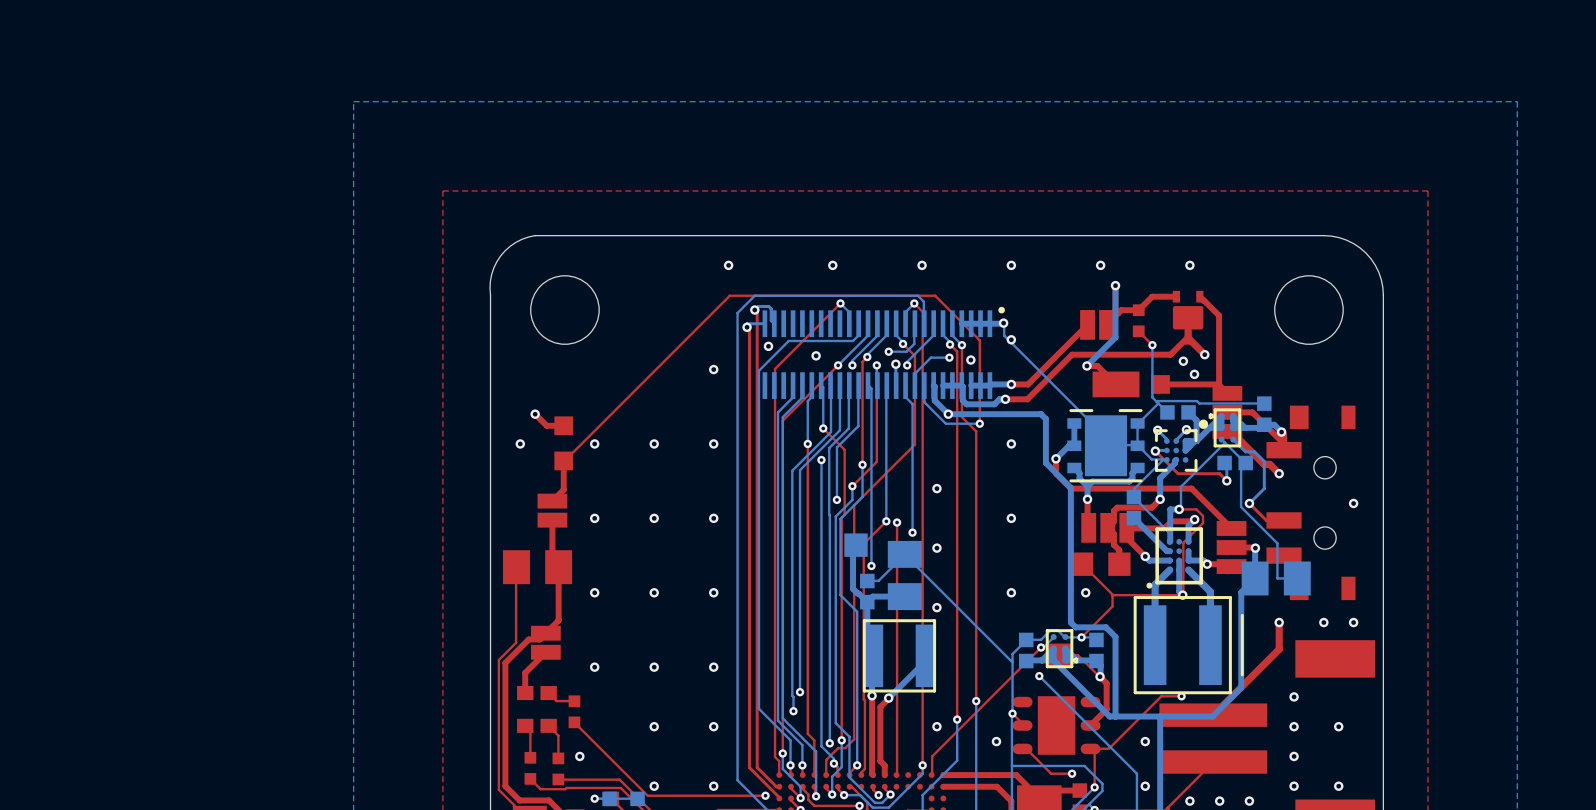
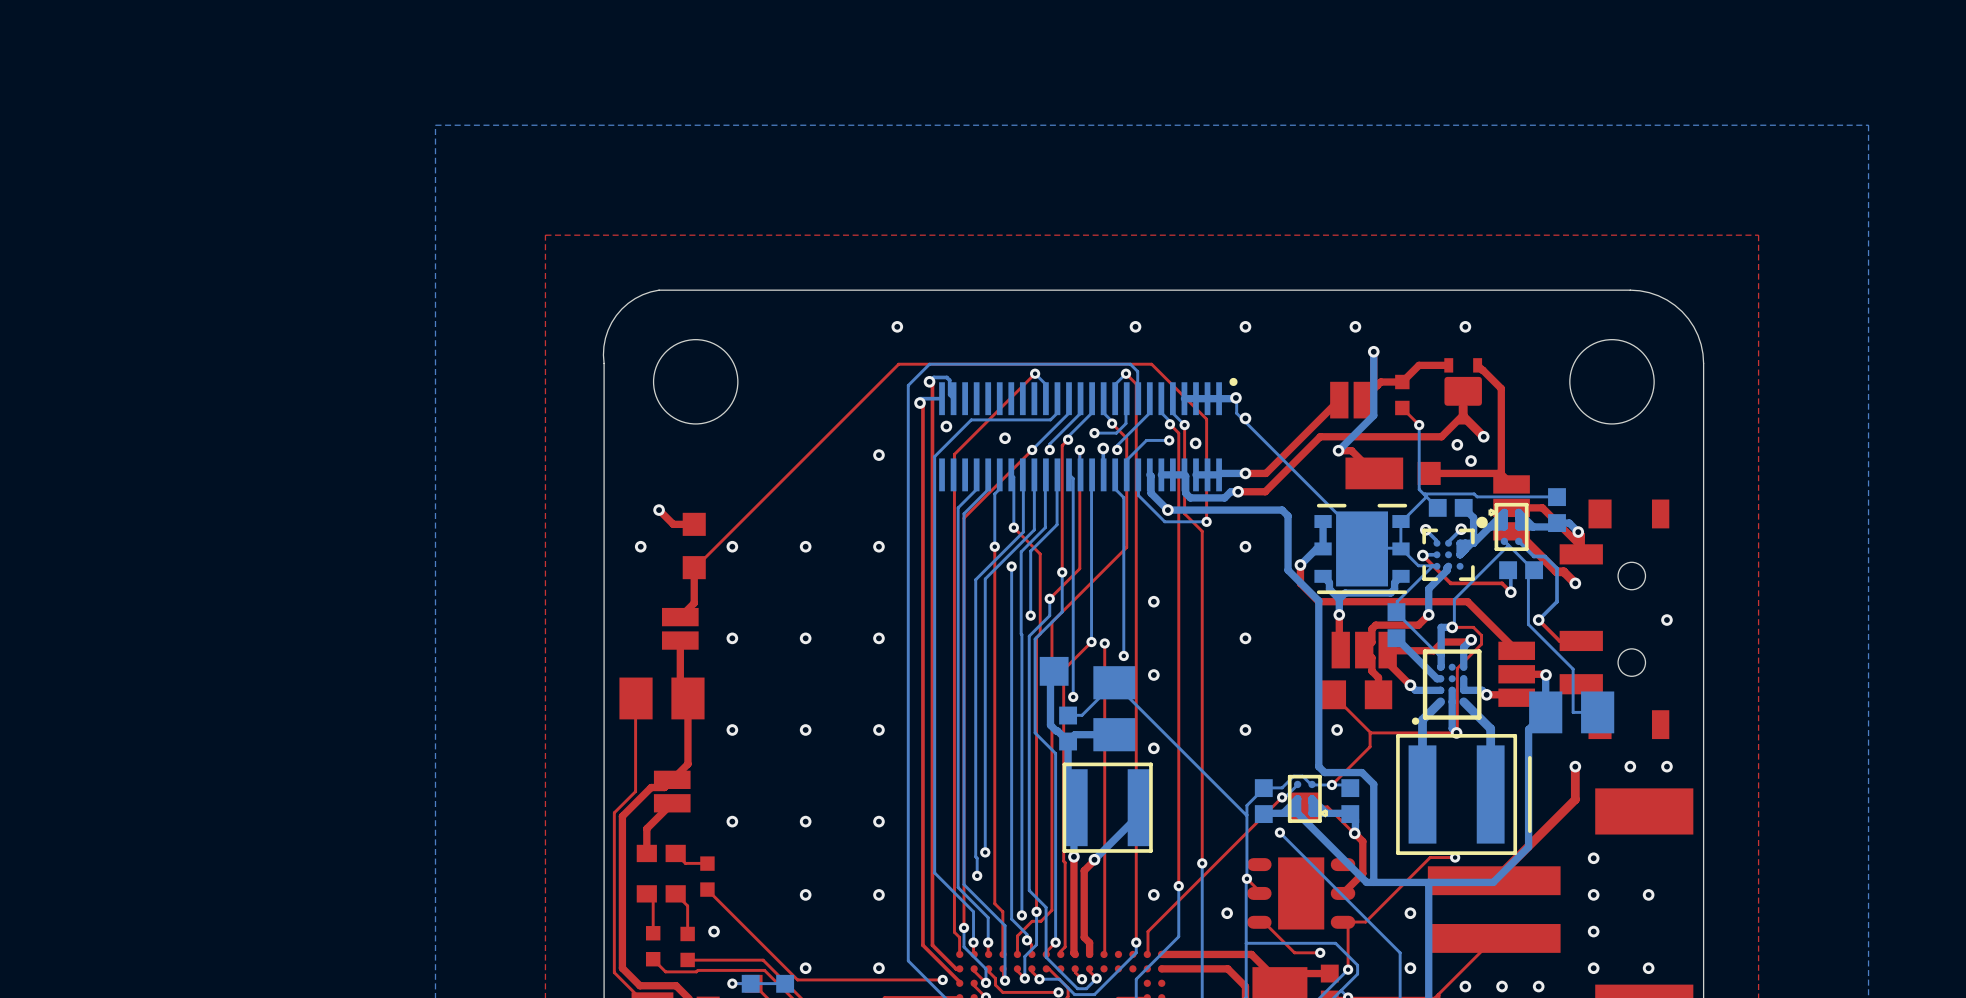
via: (832, 265) -> none

